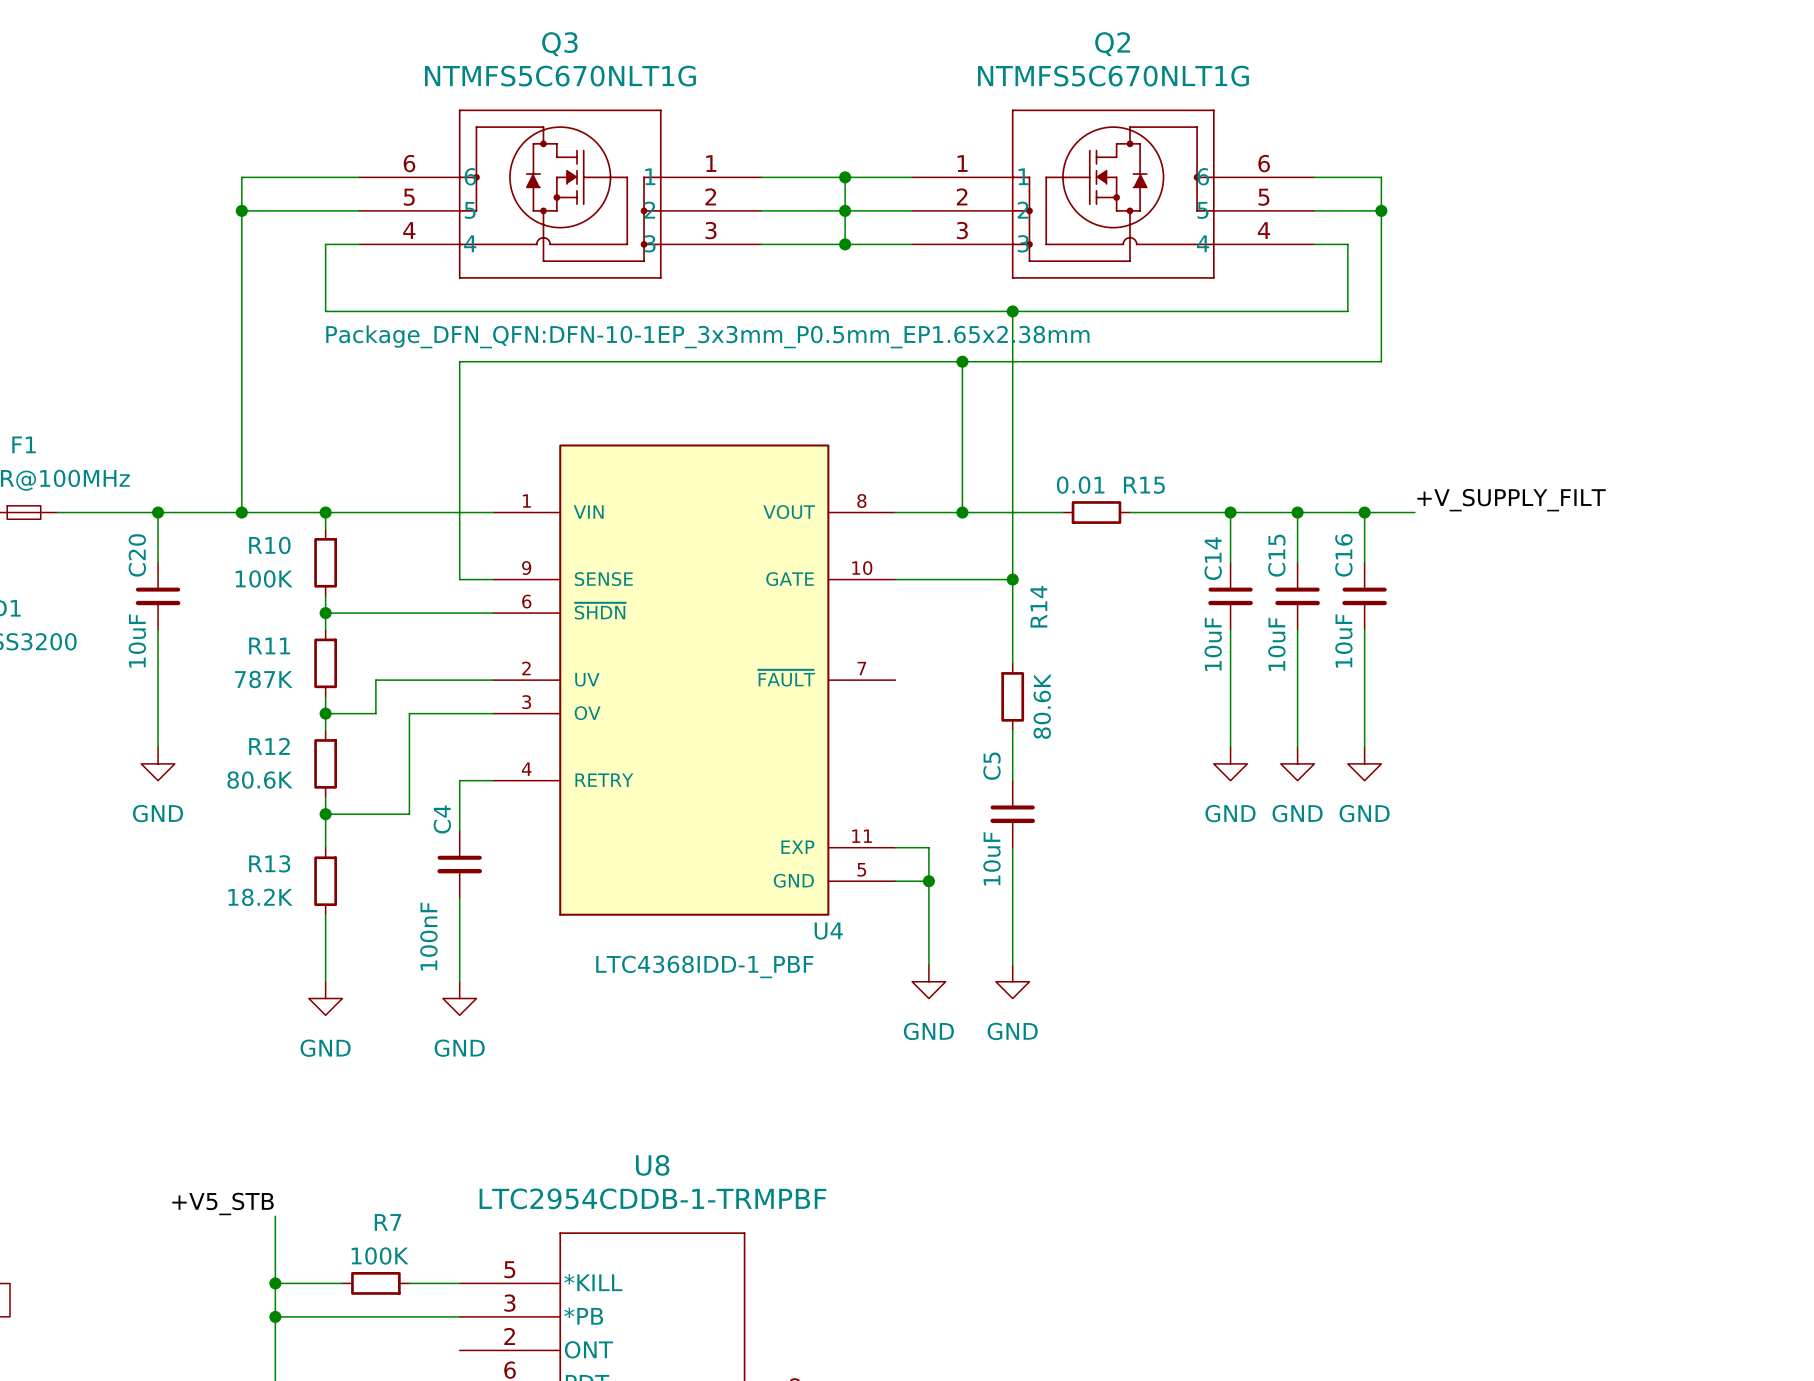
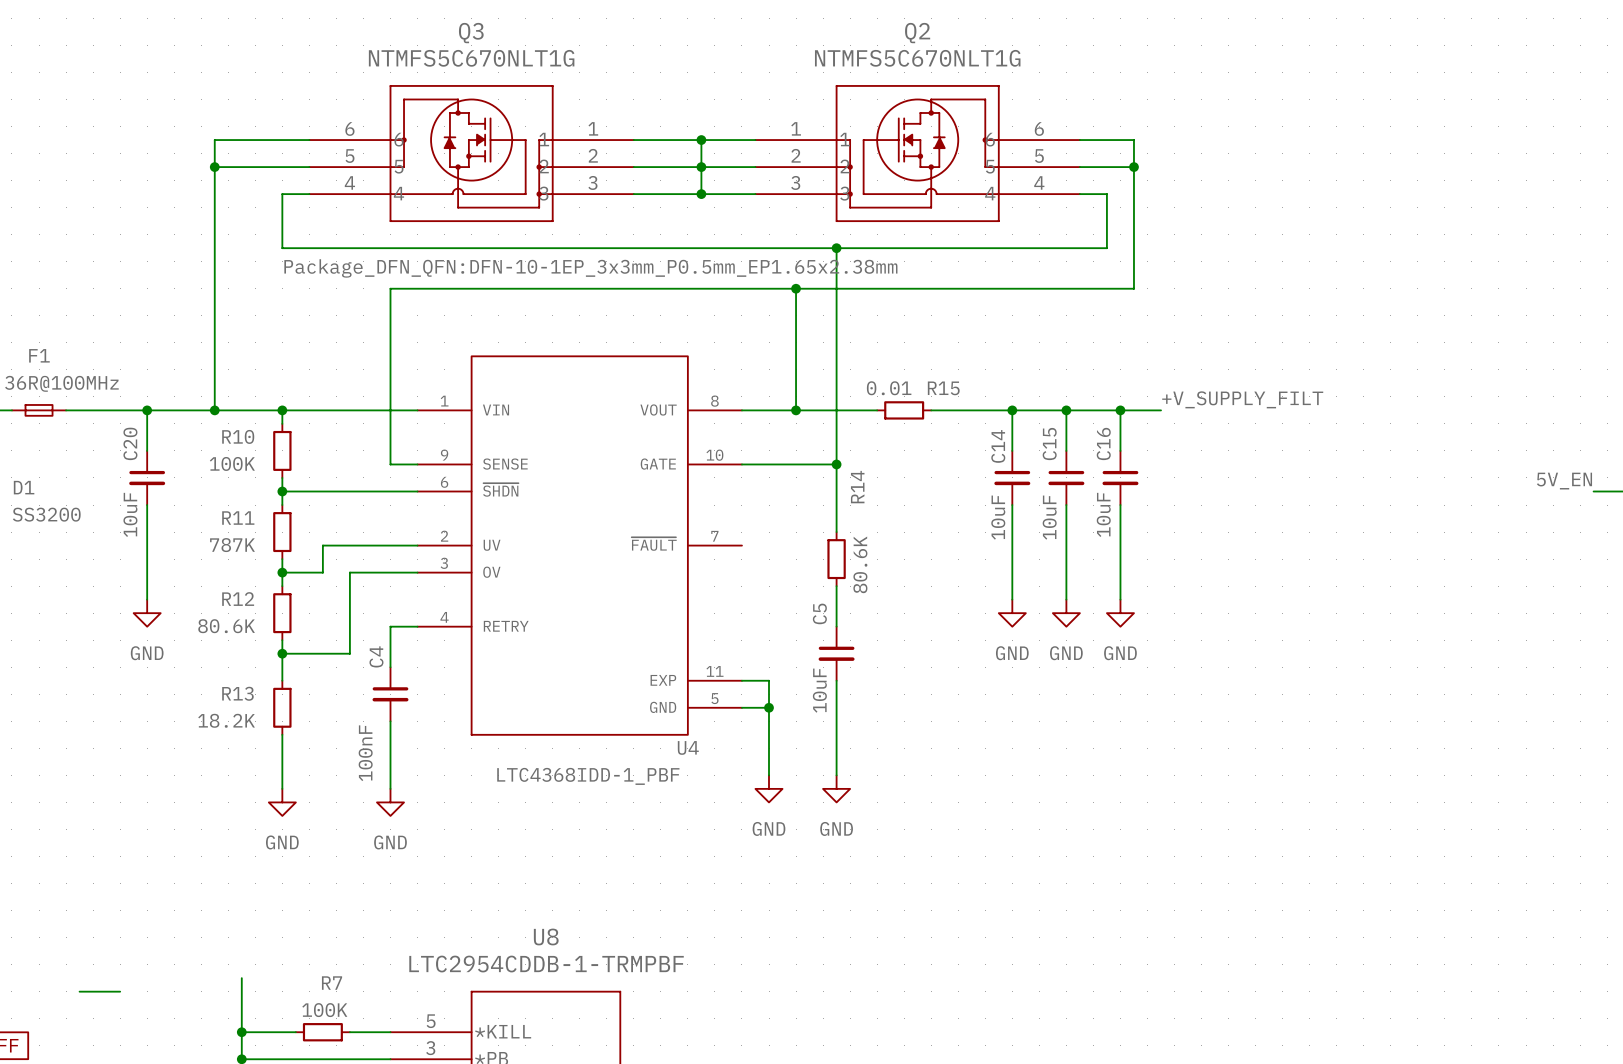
label: +V5_STB (223, 1203) -> none
wire: none -> (79, 991) (120, 991)

